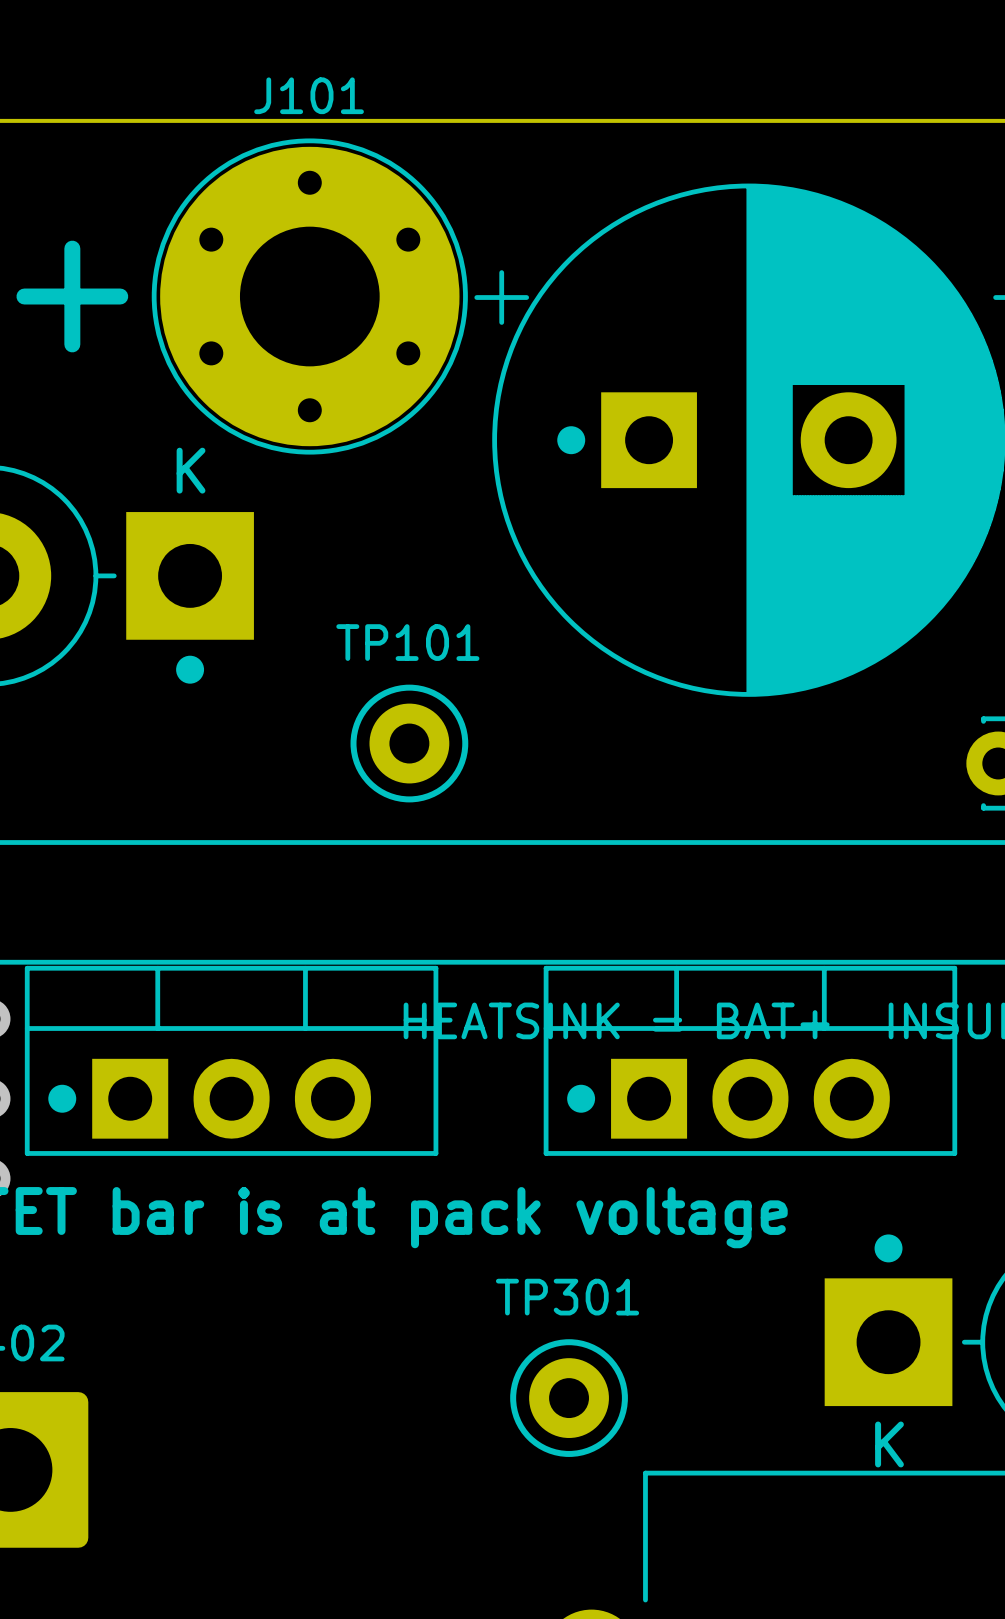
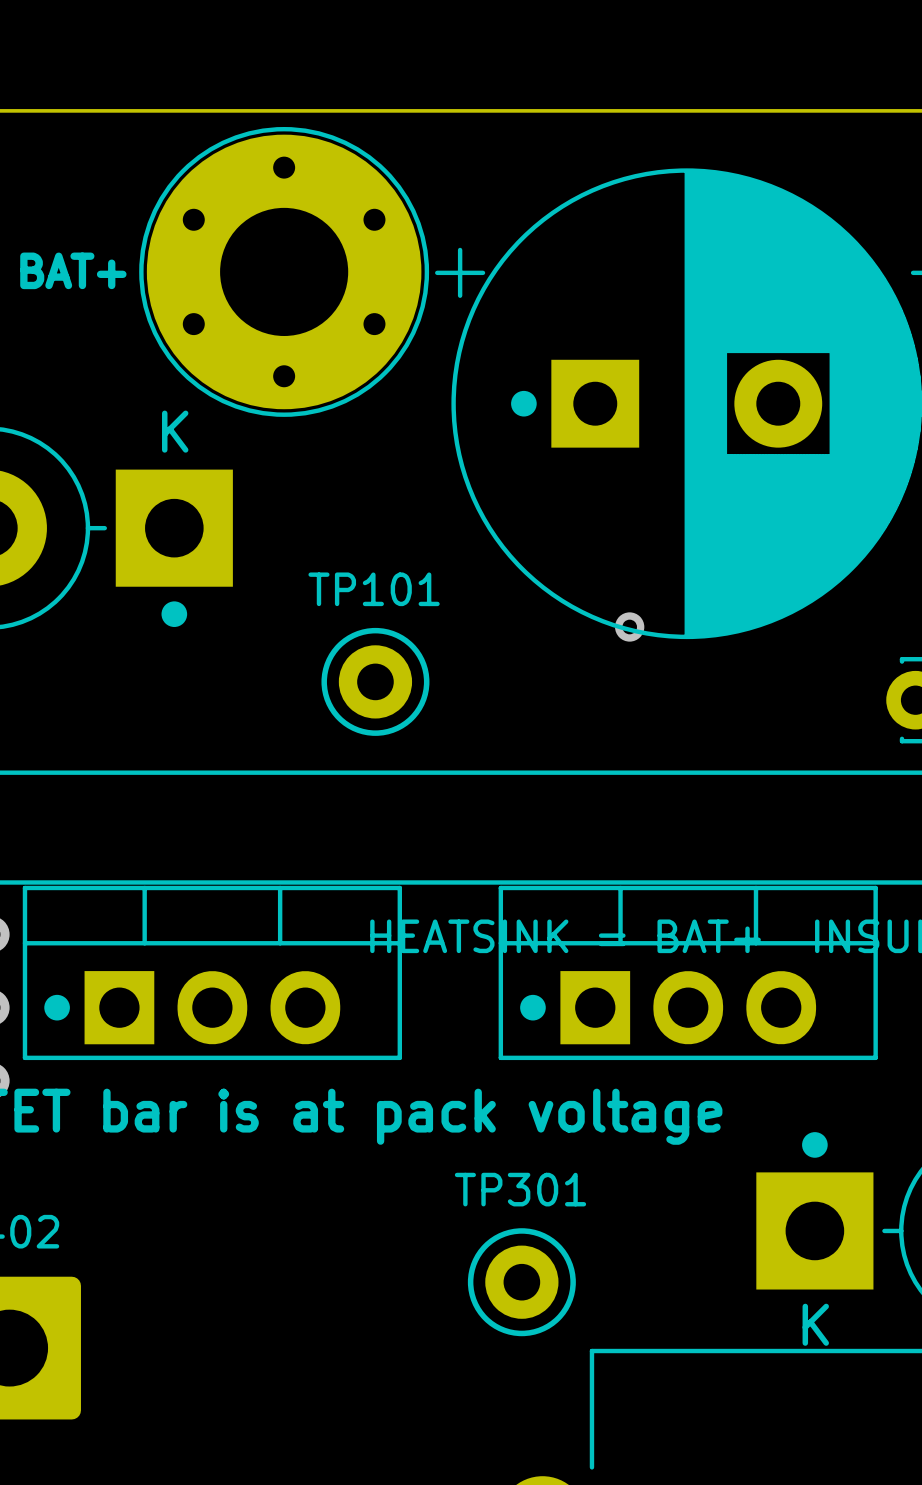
J101 name: J101 (309, 95) -> none
line: (72, 248) (72, 344) -> none
J101 value: none -> BAT+ (73, 270)
line: (24, 296) (120, 296) -> none
via: none -> (629, 626)

